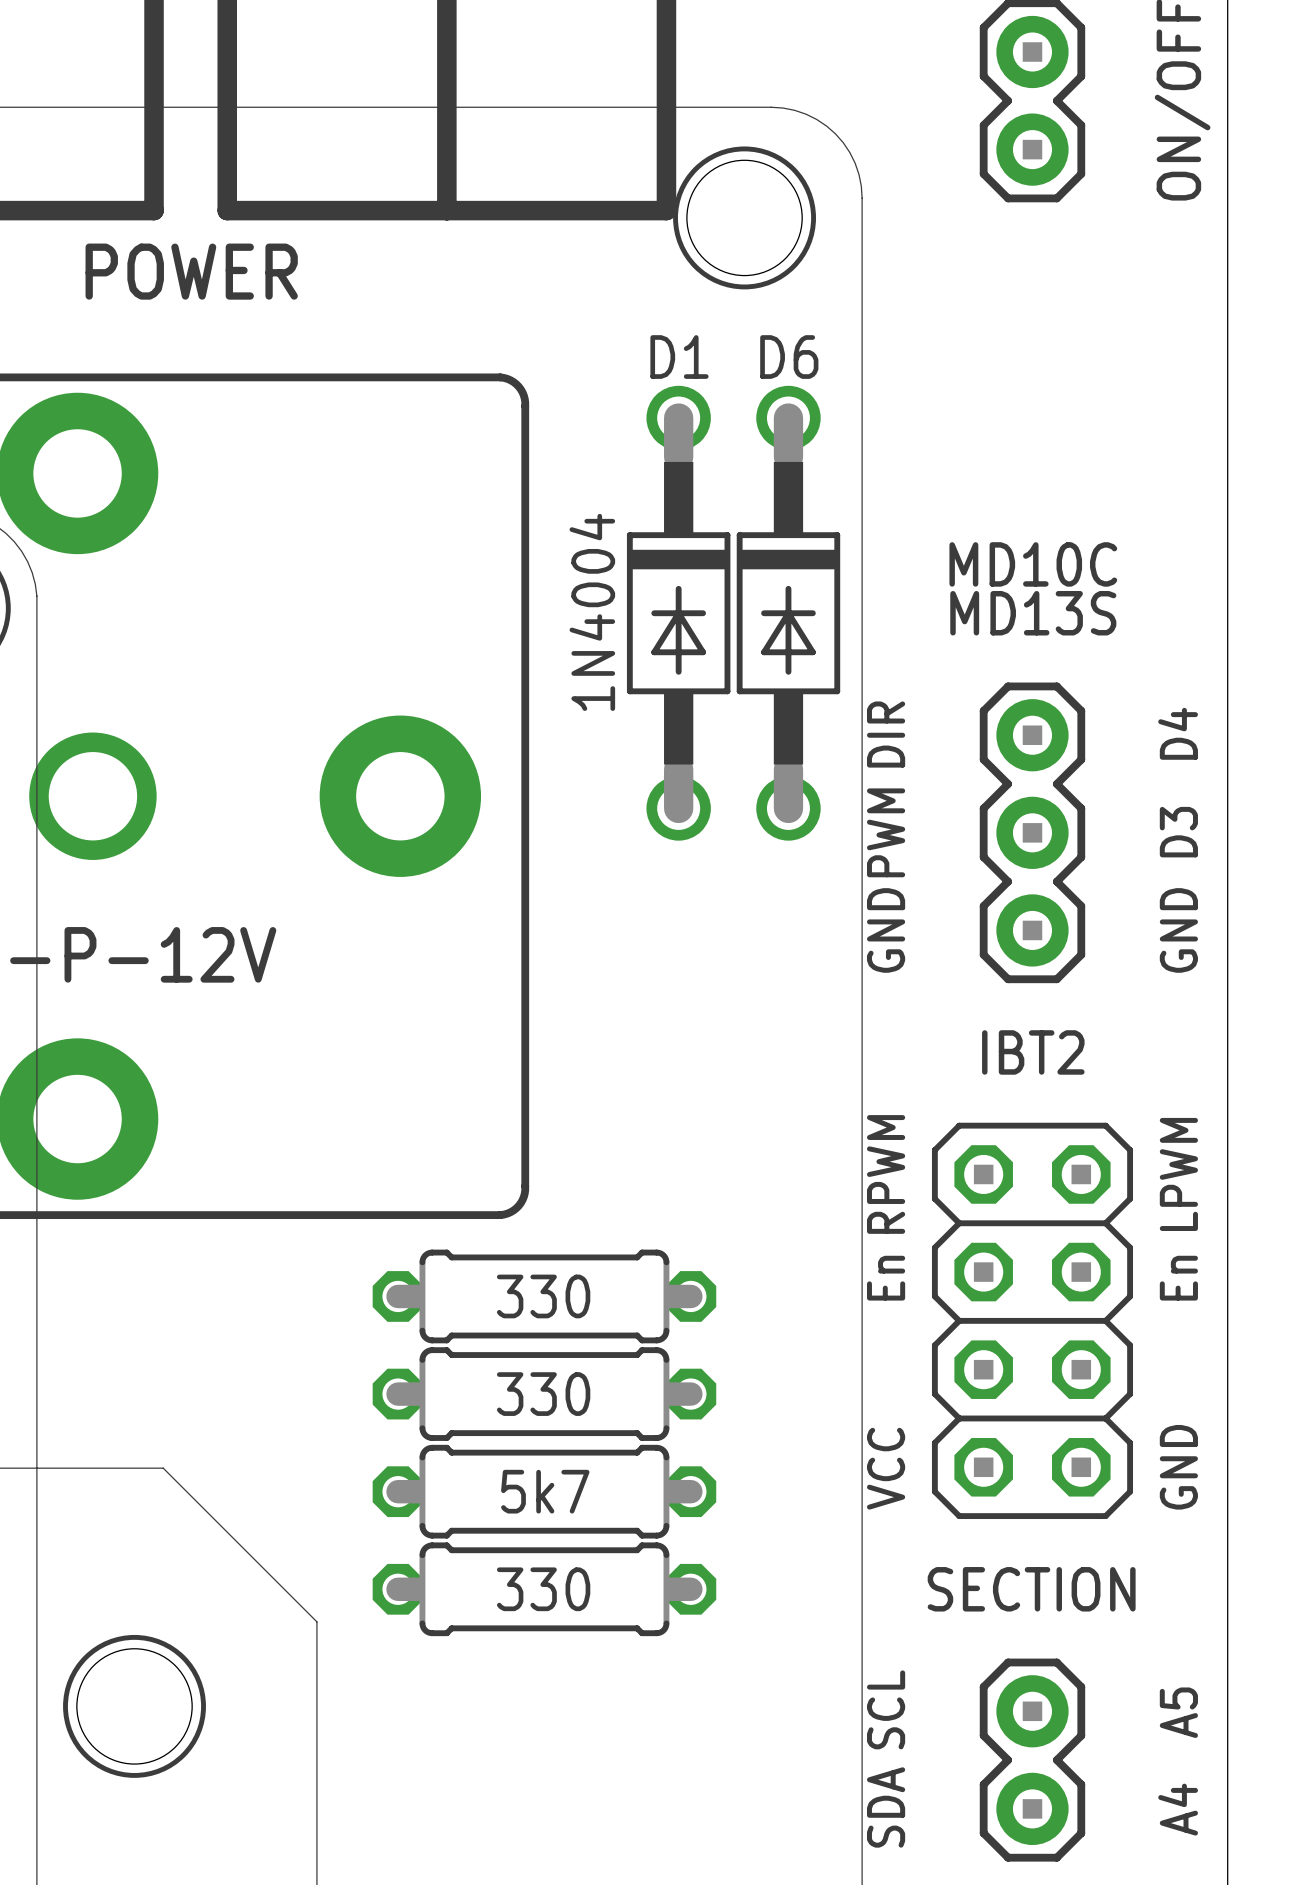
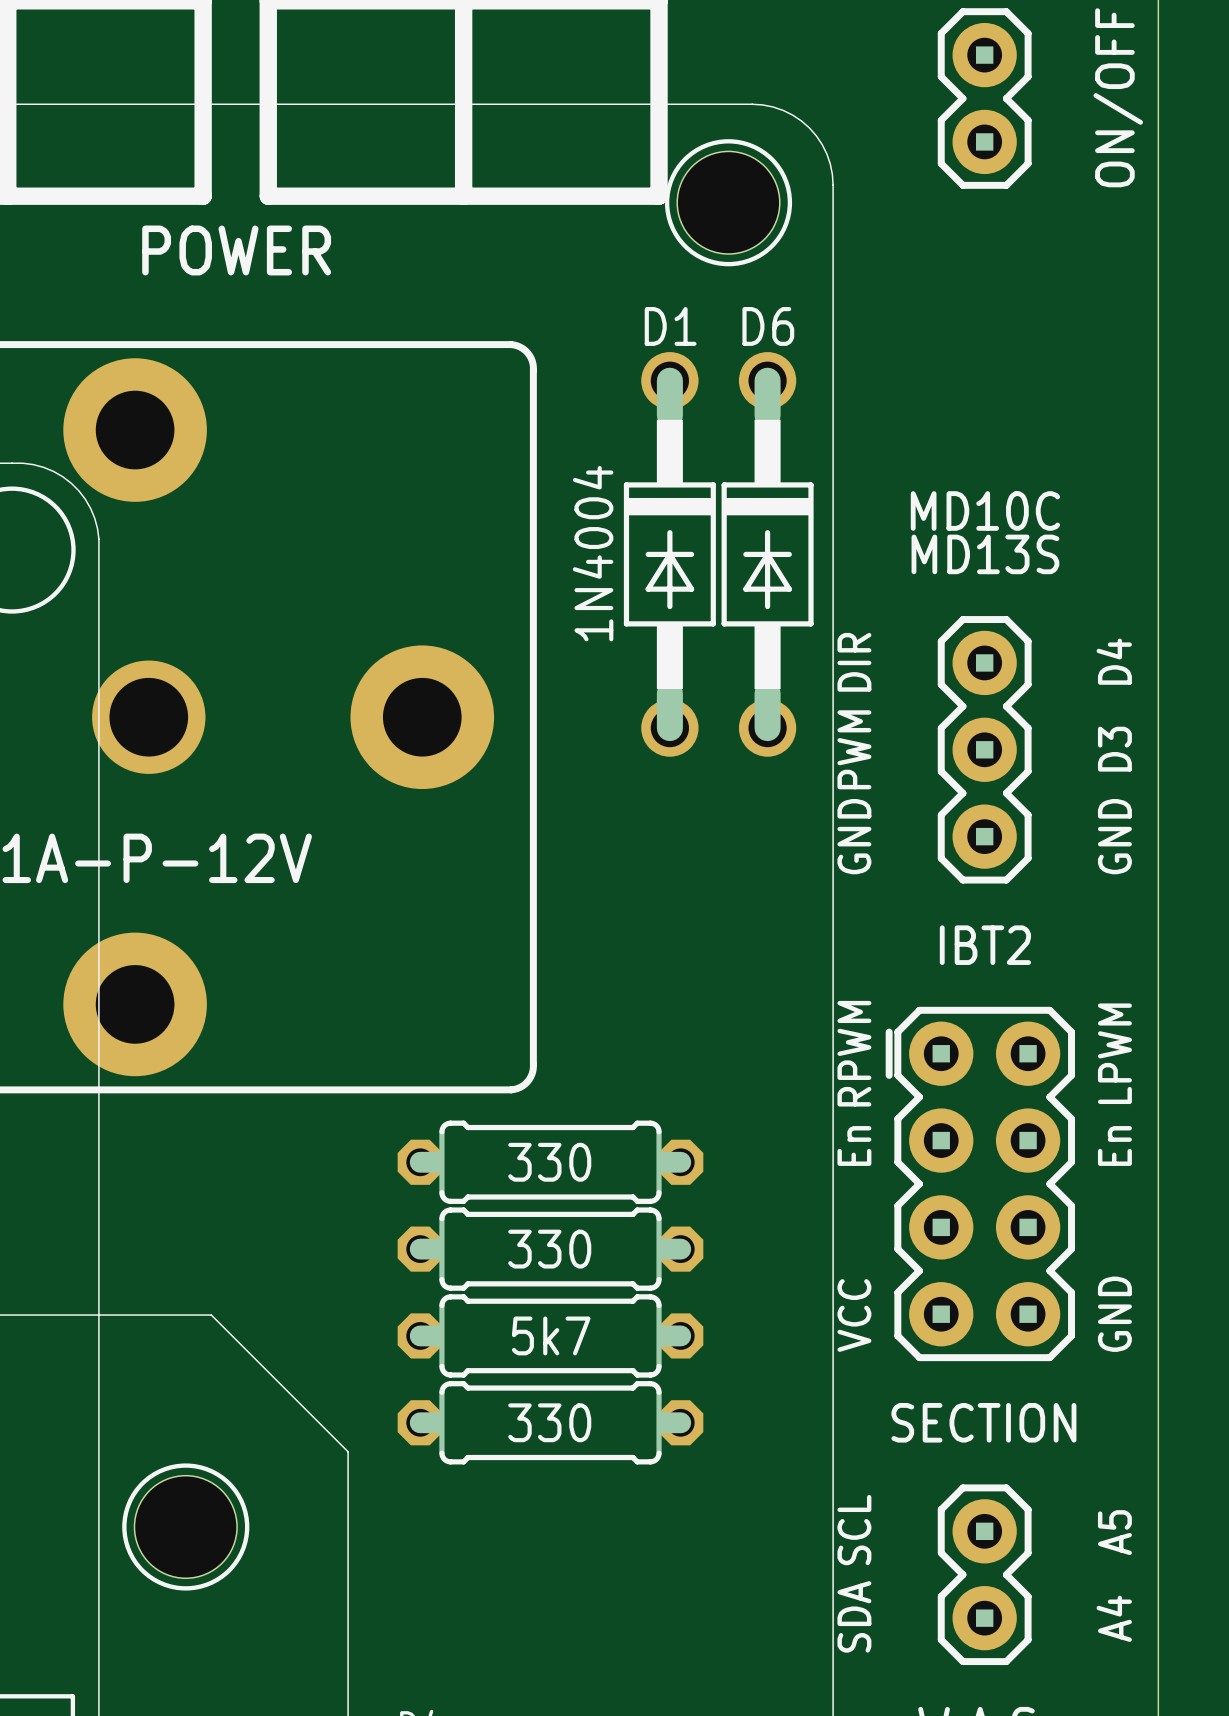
IBT2 footprint: [931, 1122, 1134, 1520] -> [885, 1006, 1075, 1362]

